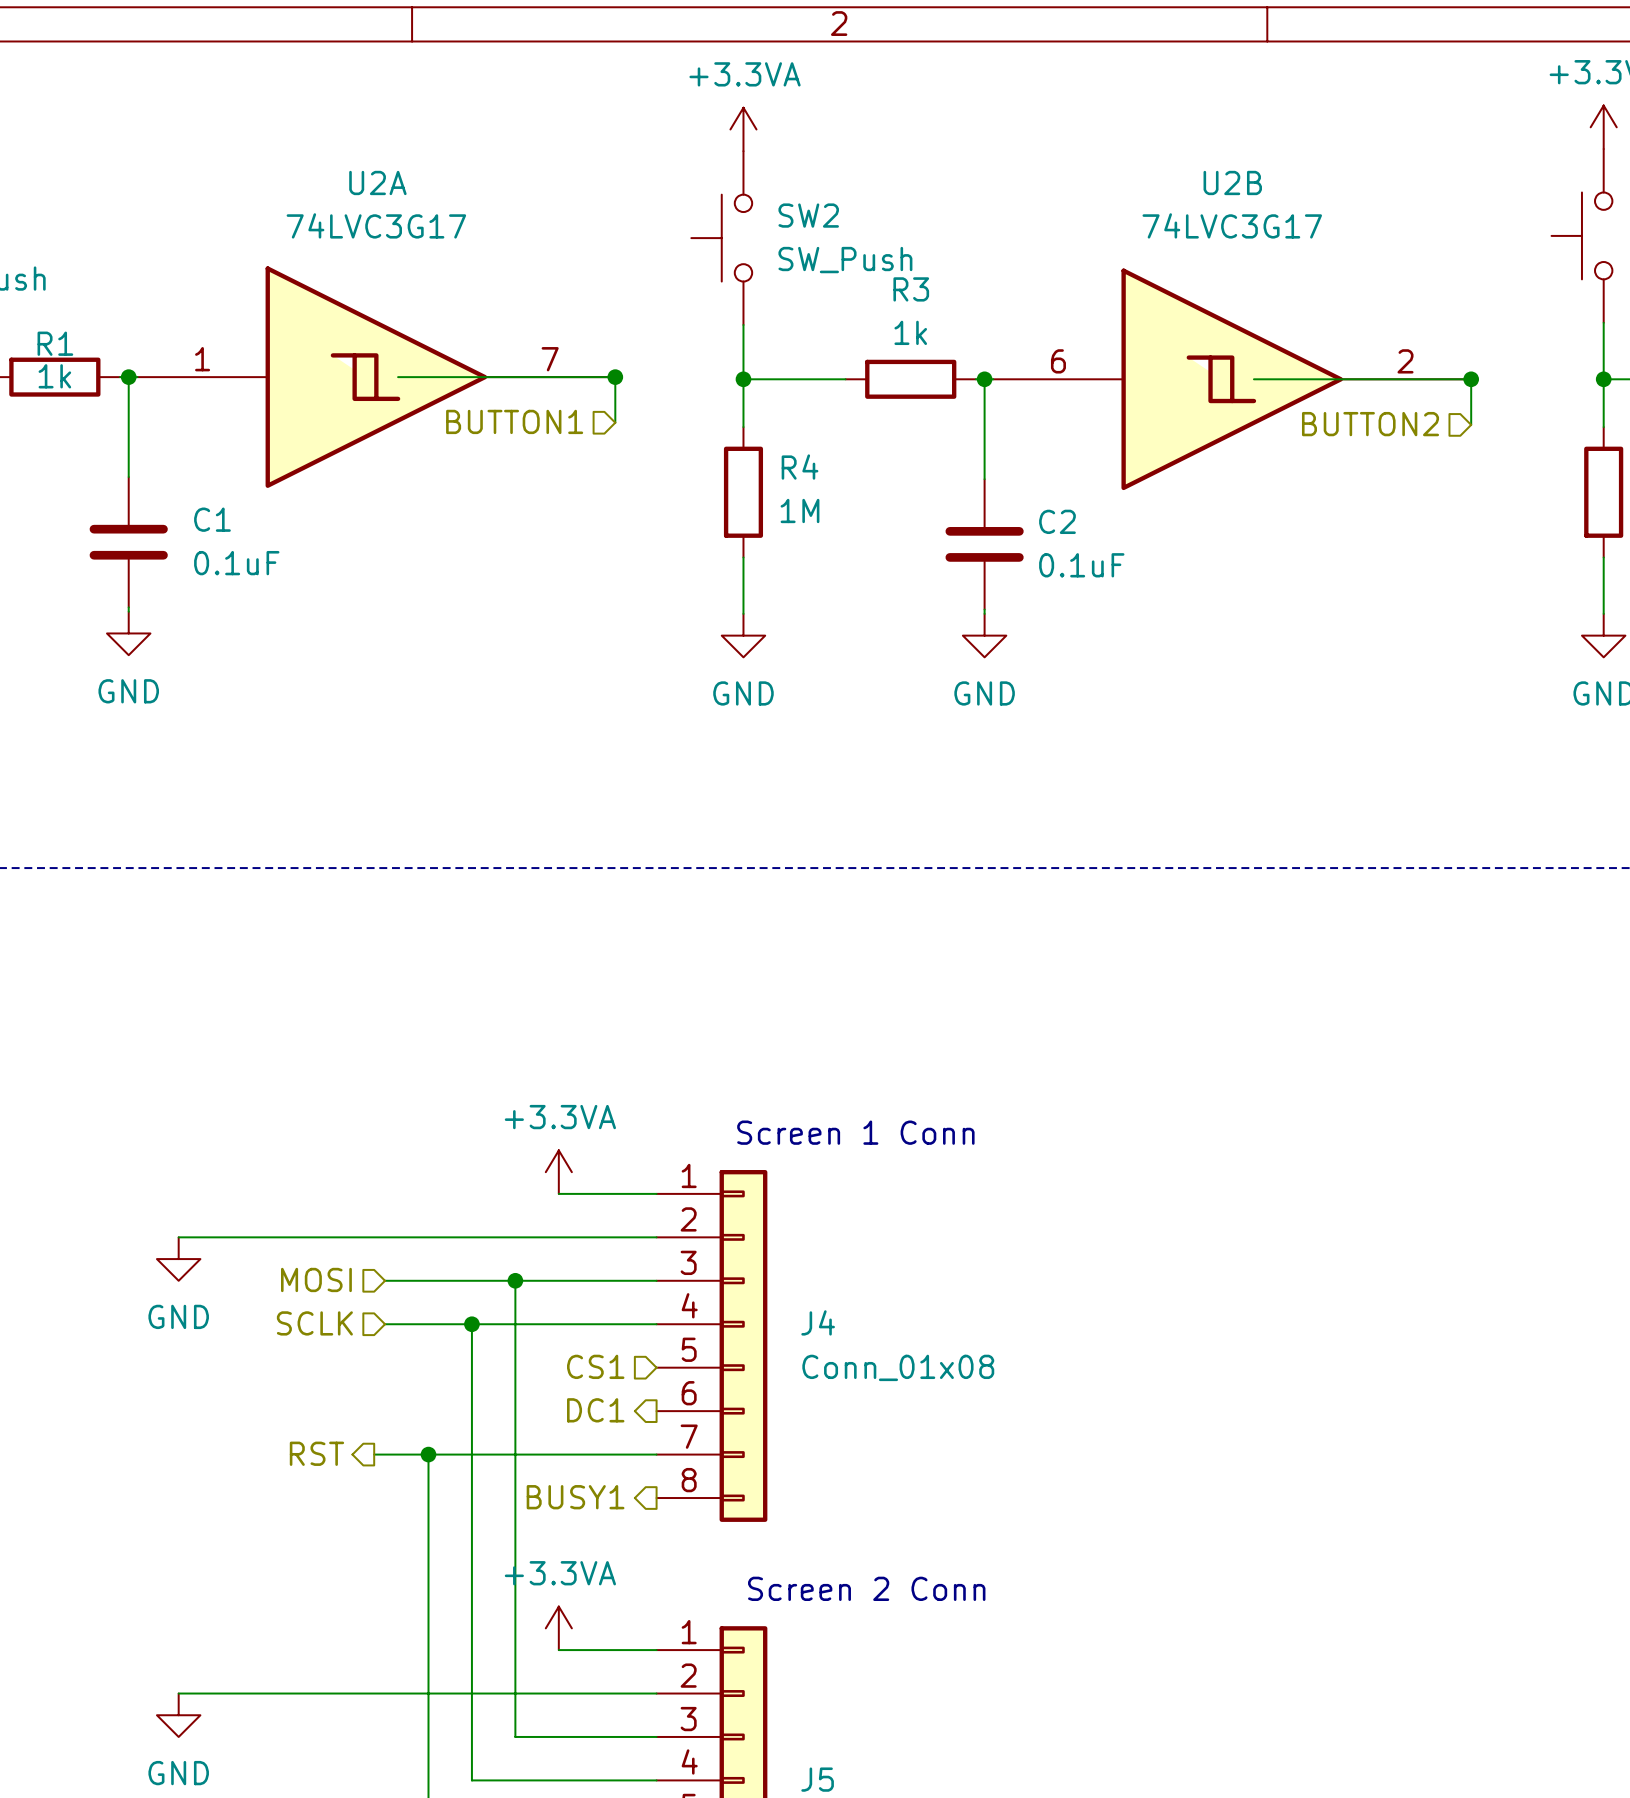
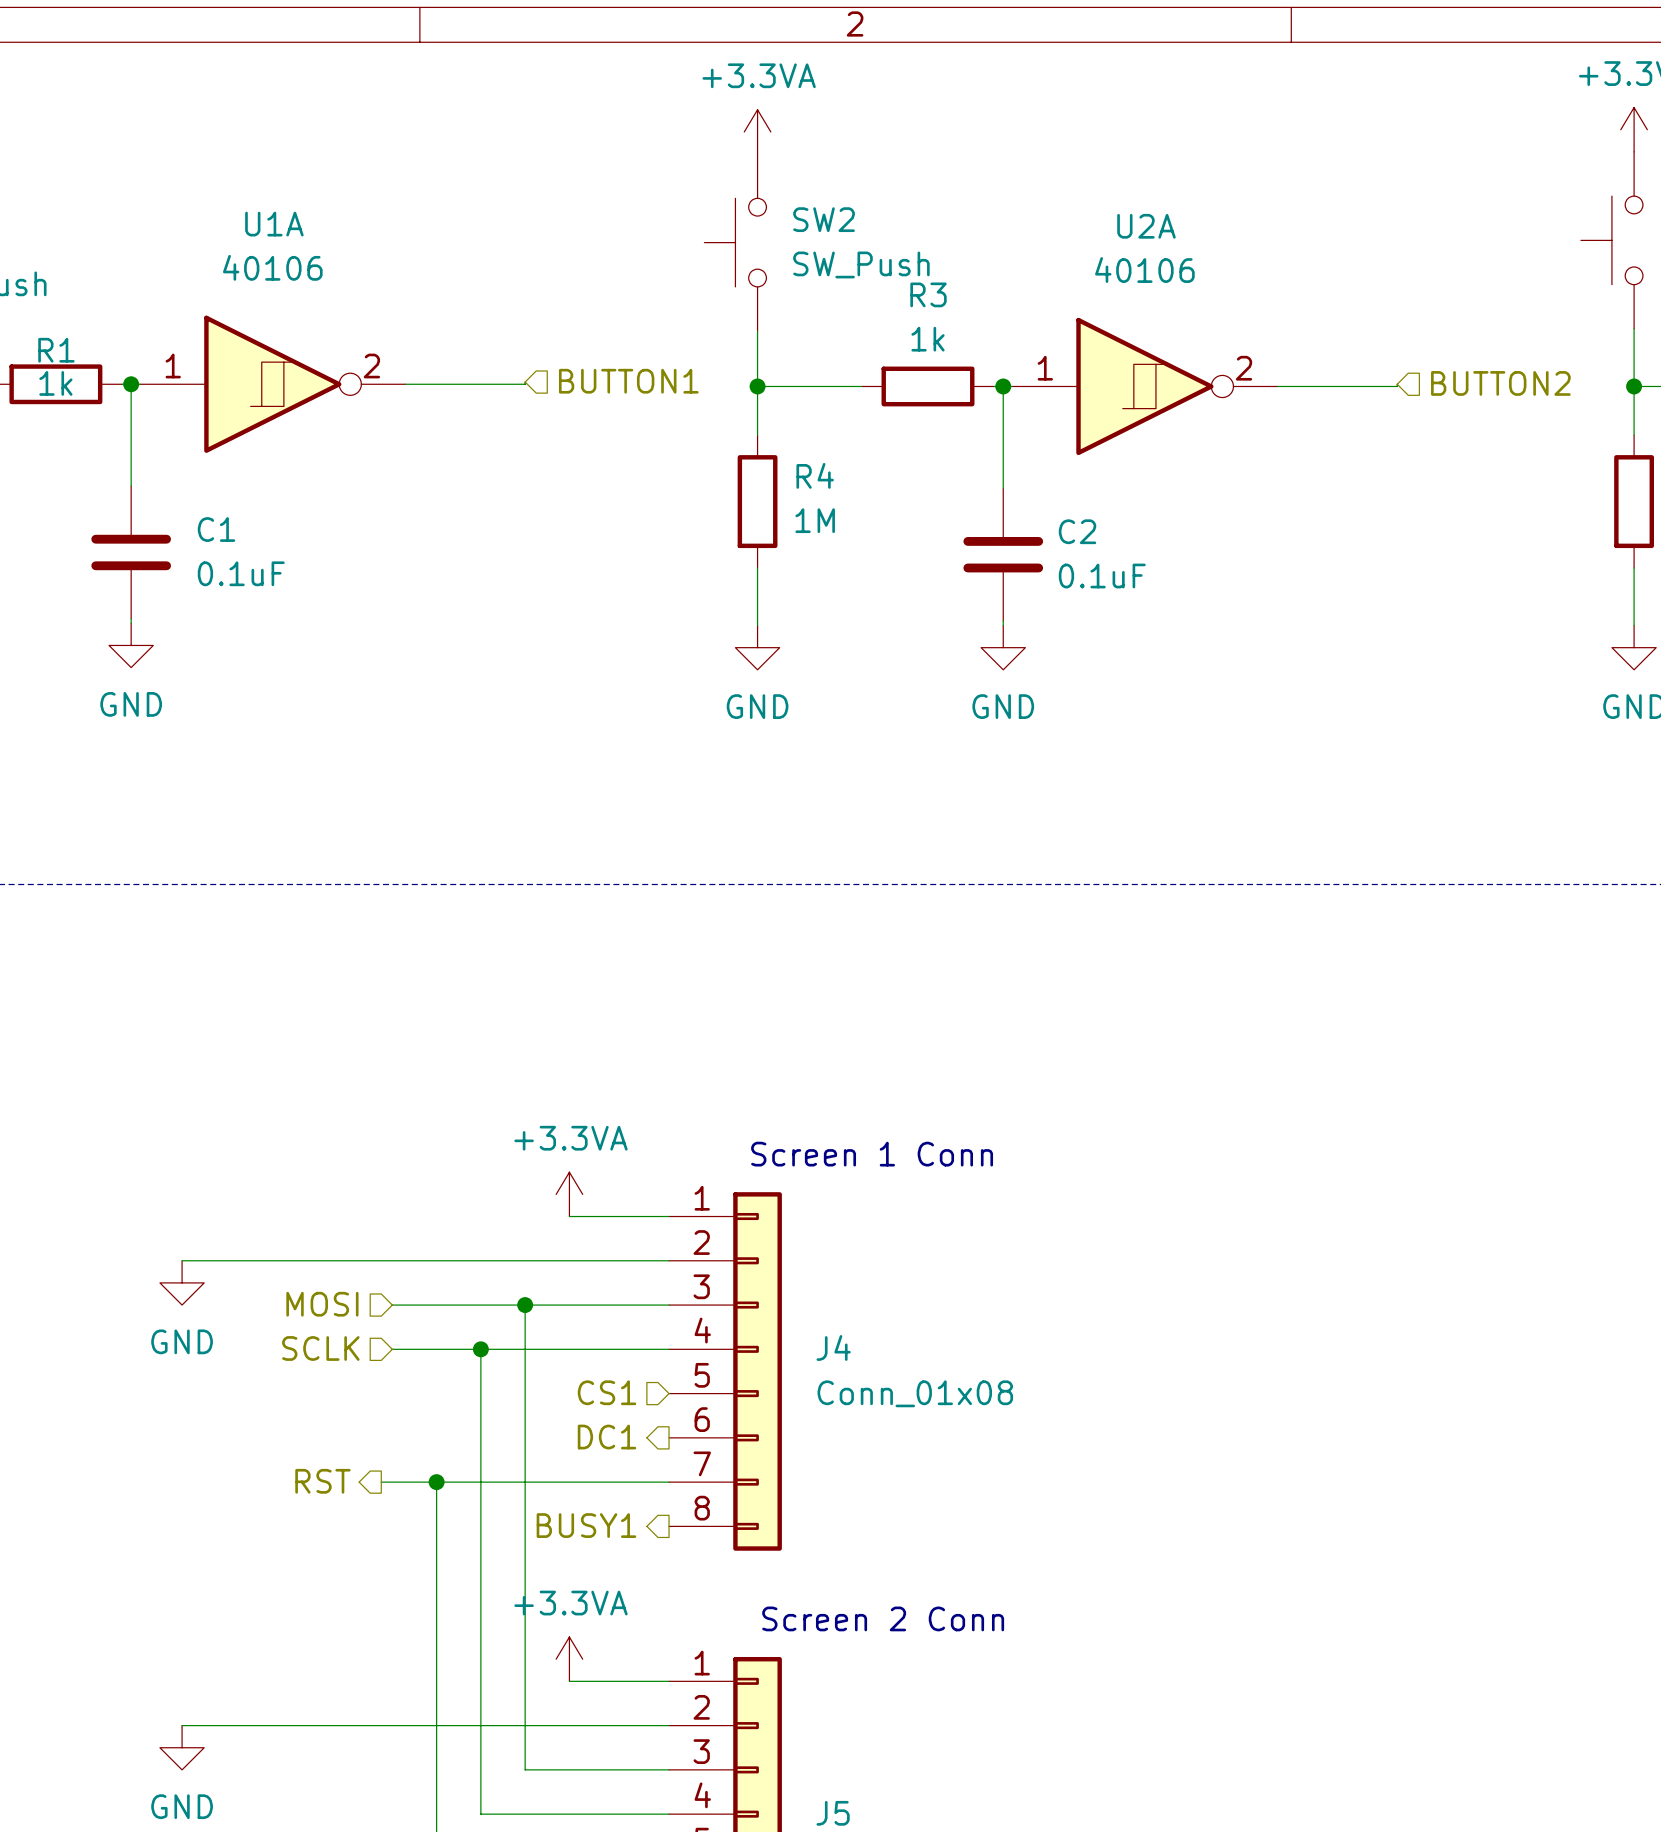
U2A name position: U2A (377, 182) -> U2A (1146, 226)
U2A value: 74LVC3G17 (376, 225) -> 40106 (1144, 270)
U2A symbol: [137, 266, 616, 488] -> [1012, 317, 1278, 456]
U1A: none -> 40106 (272, 384)
wire: (515, 377) (615, 377) (615, 422) -> (525, 384) (525, 382)
junction: (615, 377) -> none
U2B: 74LVC3G17 (1232, 379) -> none
wire: (1371, 379) (1471, 379) (1471, 424) -> (1397, 386) (1397, 384)
junction: (1471, 379) -> none
hierarchical label rotation: 0° (514, 421) -> 180° (628, 381)
hierarchical label rotation: 0° (1370, 424) -> 180° (1500, 383)

